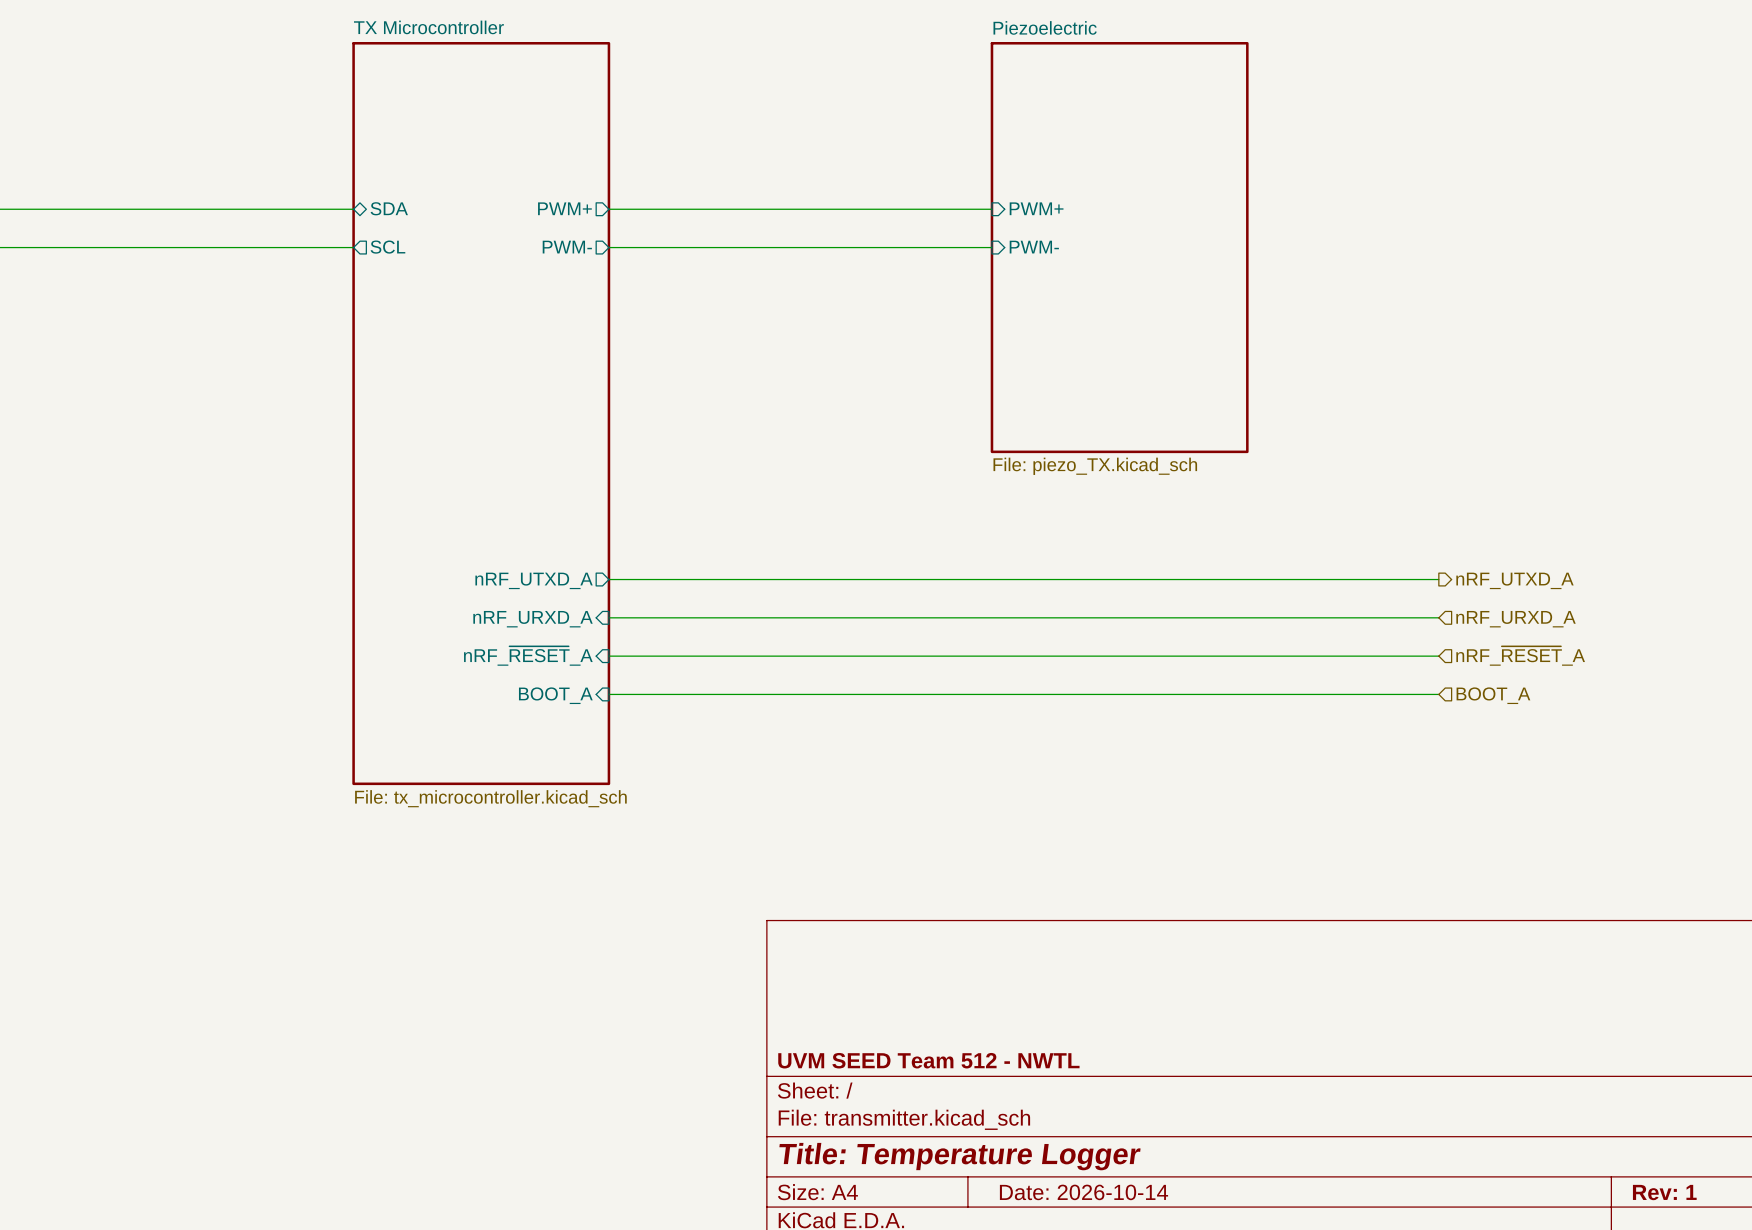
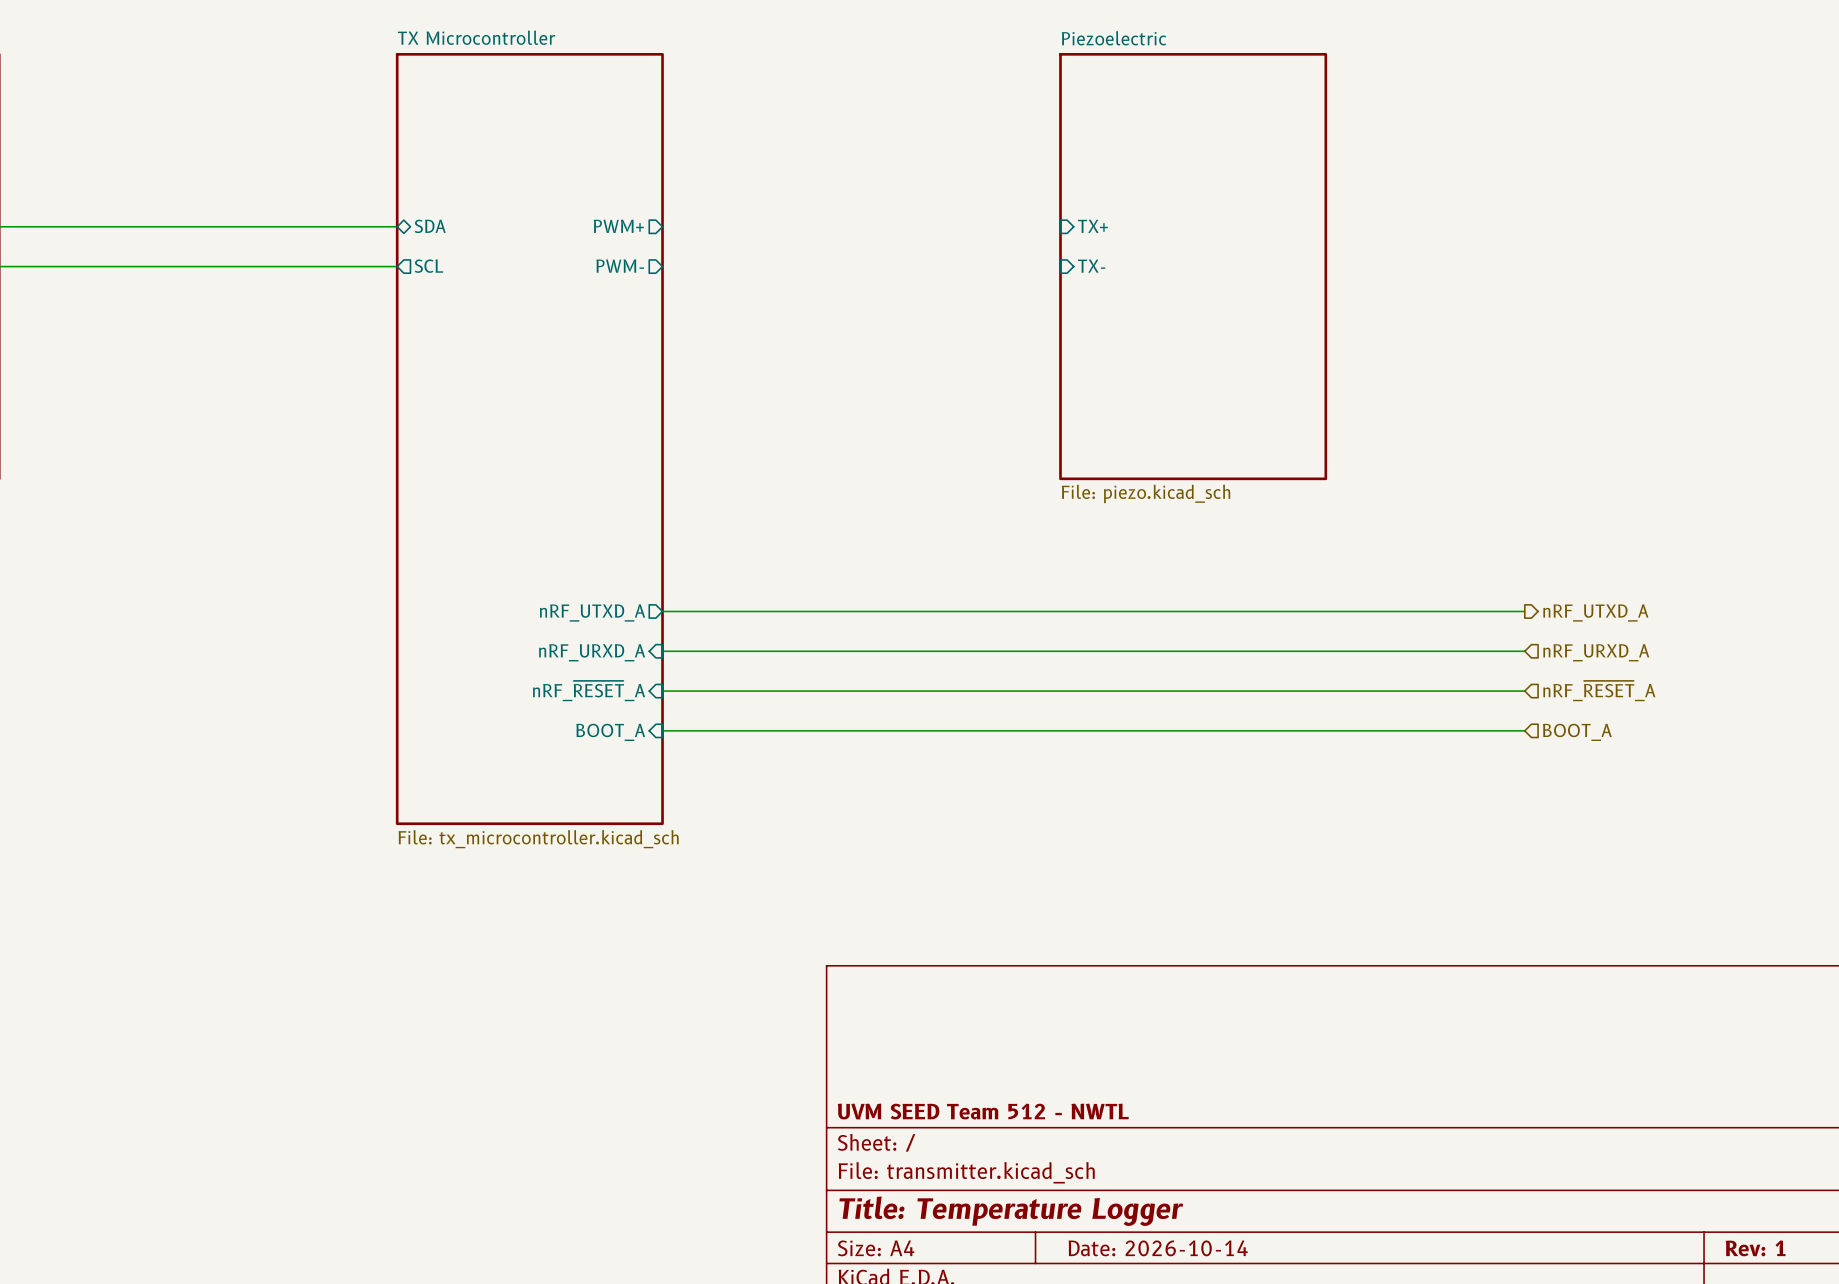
sheet pin: PWM+ (1036, 208) -> TX+ (1092, 226)
wire: (608, 209) (991, 209) -> none
wire: (608, 247) (991, 247) -> none
sheet pin: PWM- (1034, 247) -> TX- (1091, 266)
sheet Piezoelectric value: File: piezo_TX.kicad_sch (1095, 466) -> File: piezo.kicad_sch (1146, 493)

